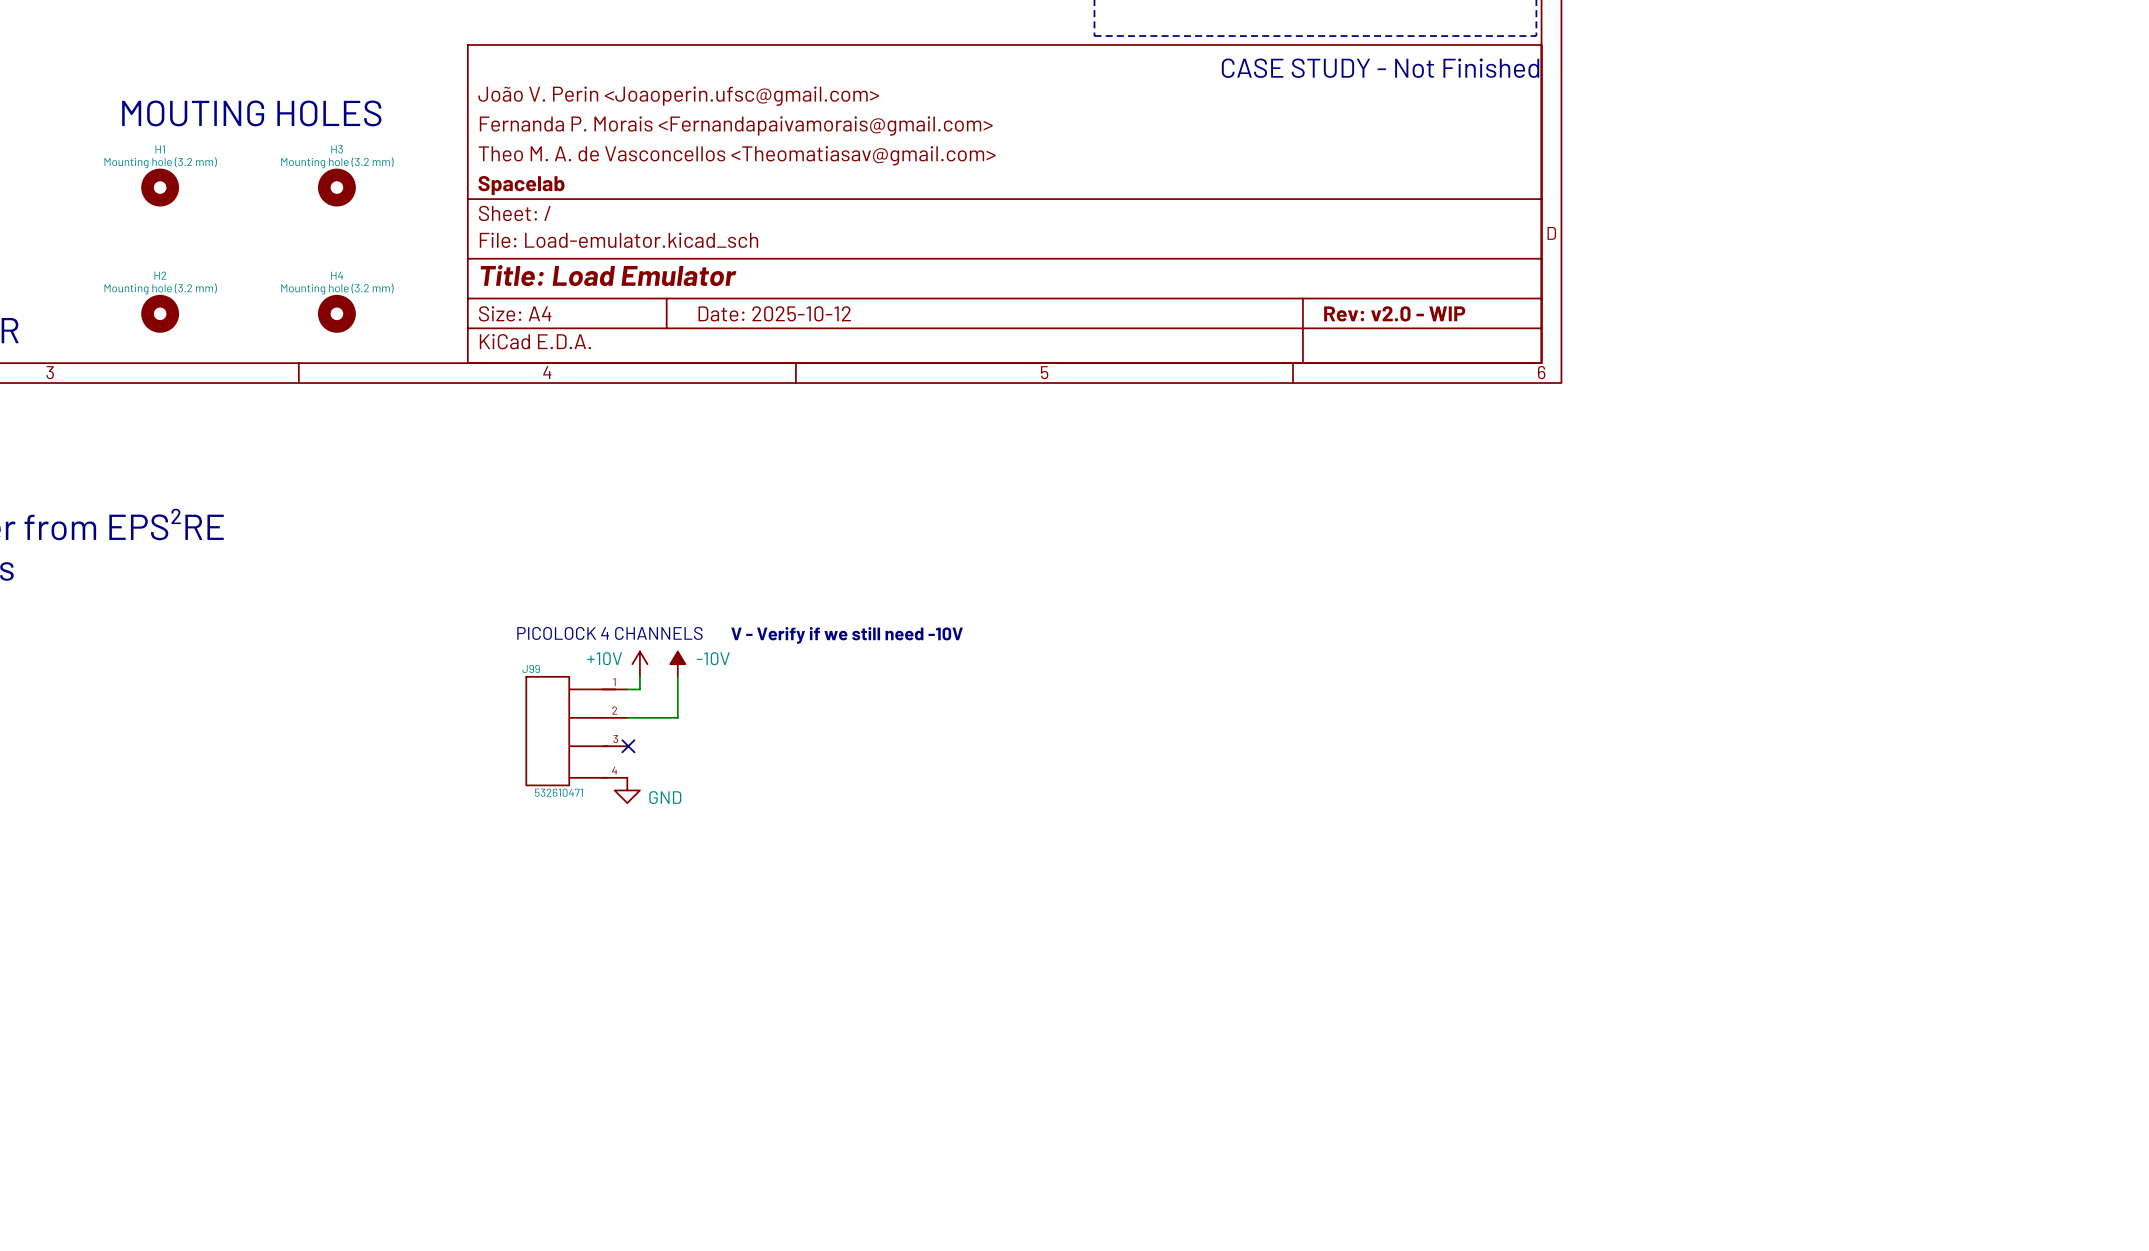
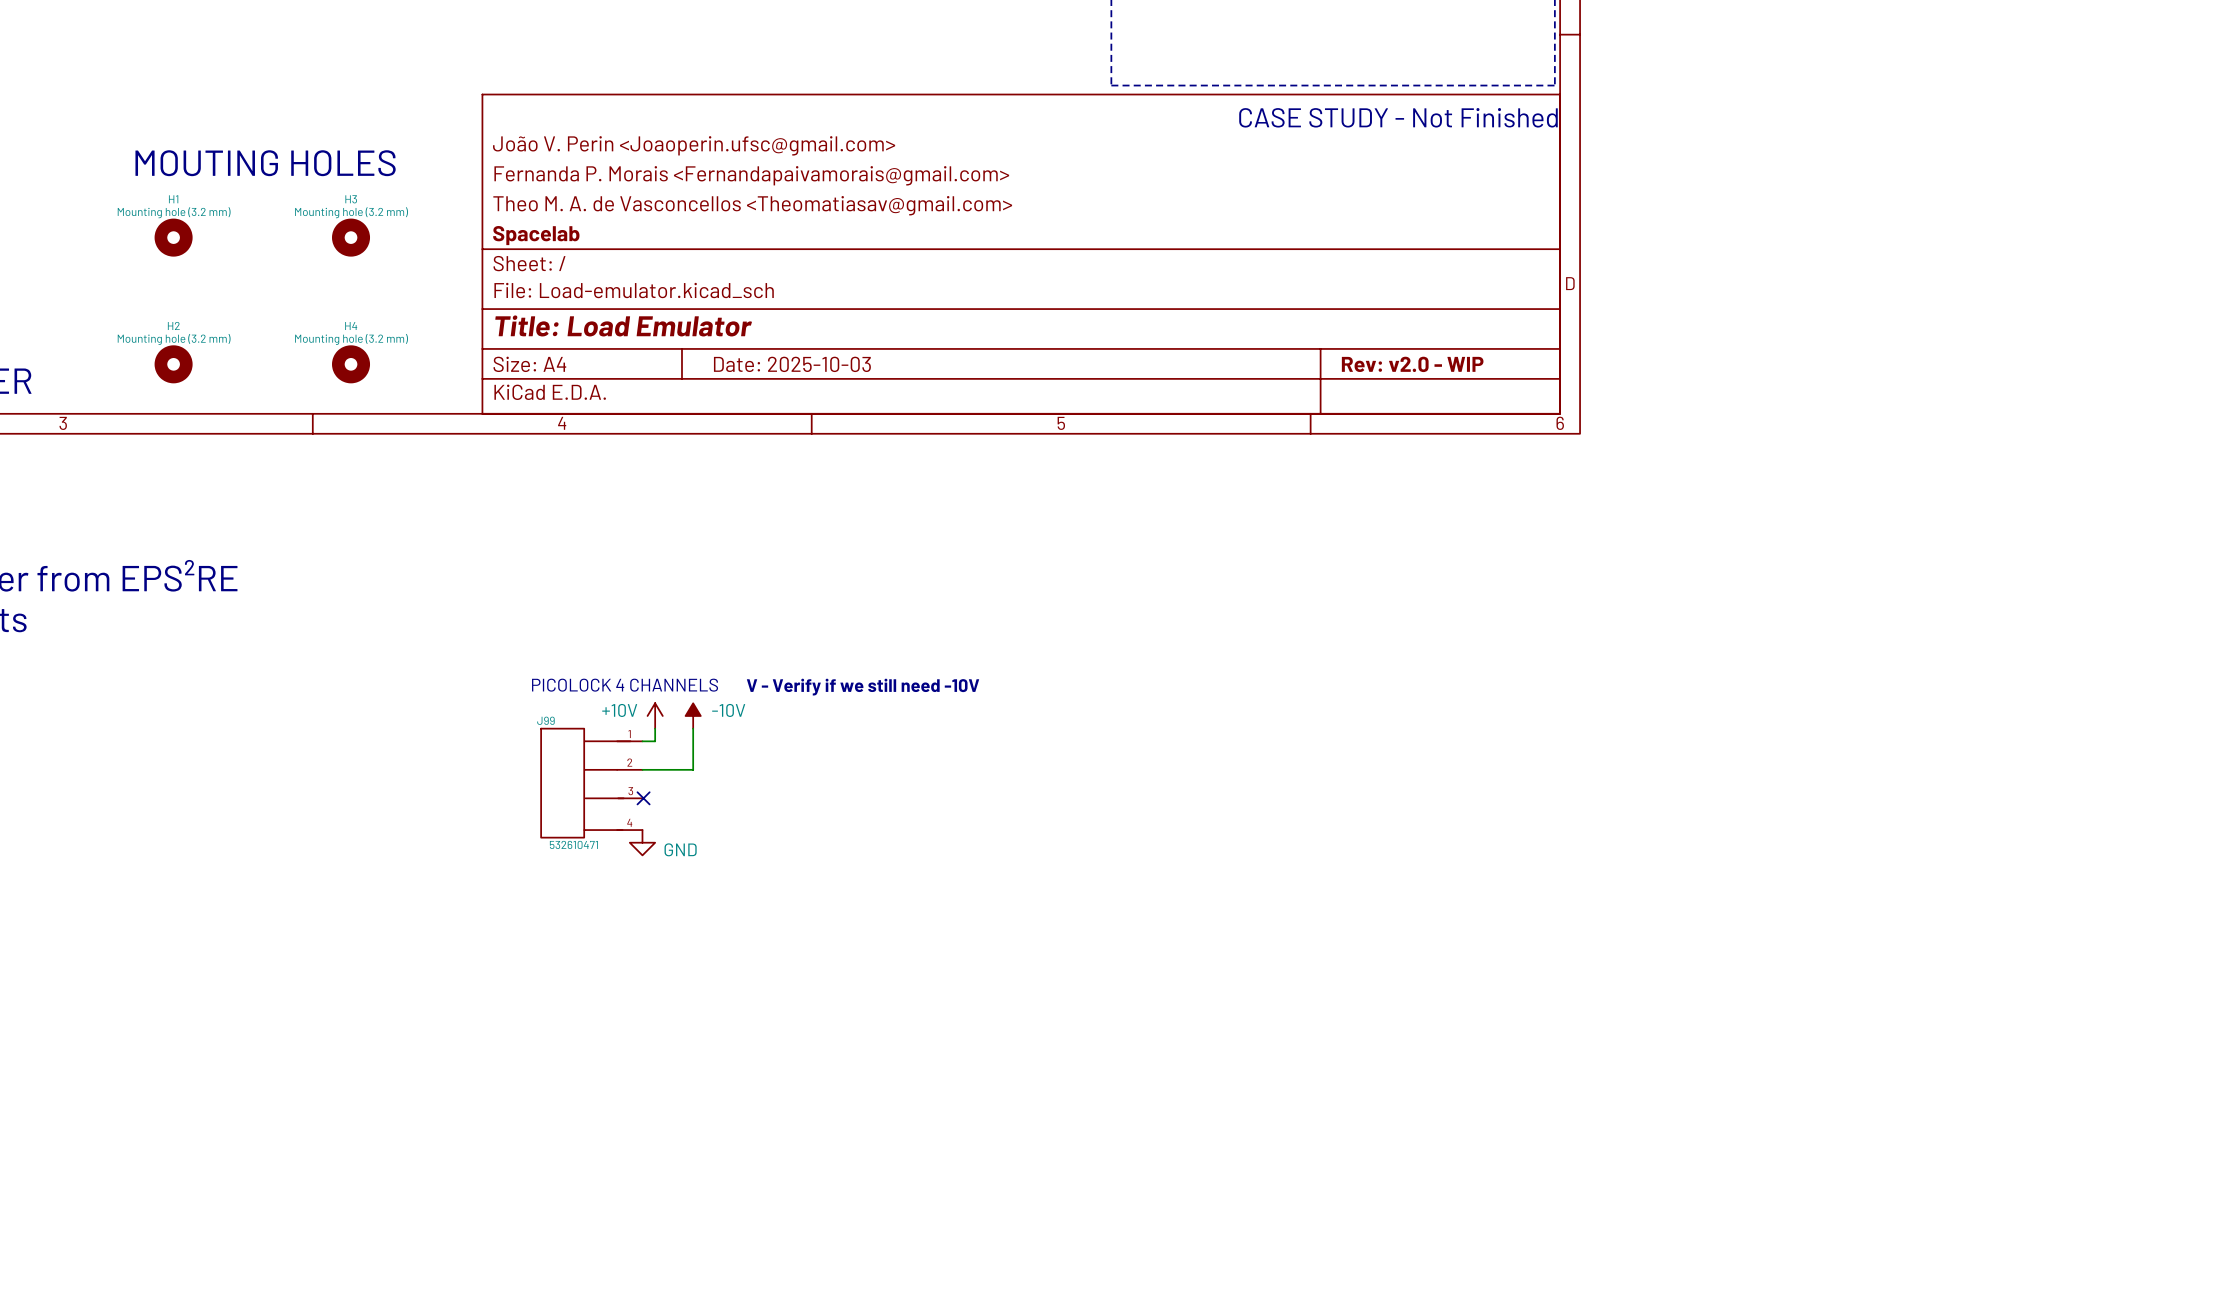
title block: Date: 2025-10-12 (774, 313) -> Date: 2025-10-03 (792, 364)

